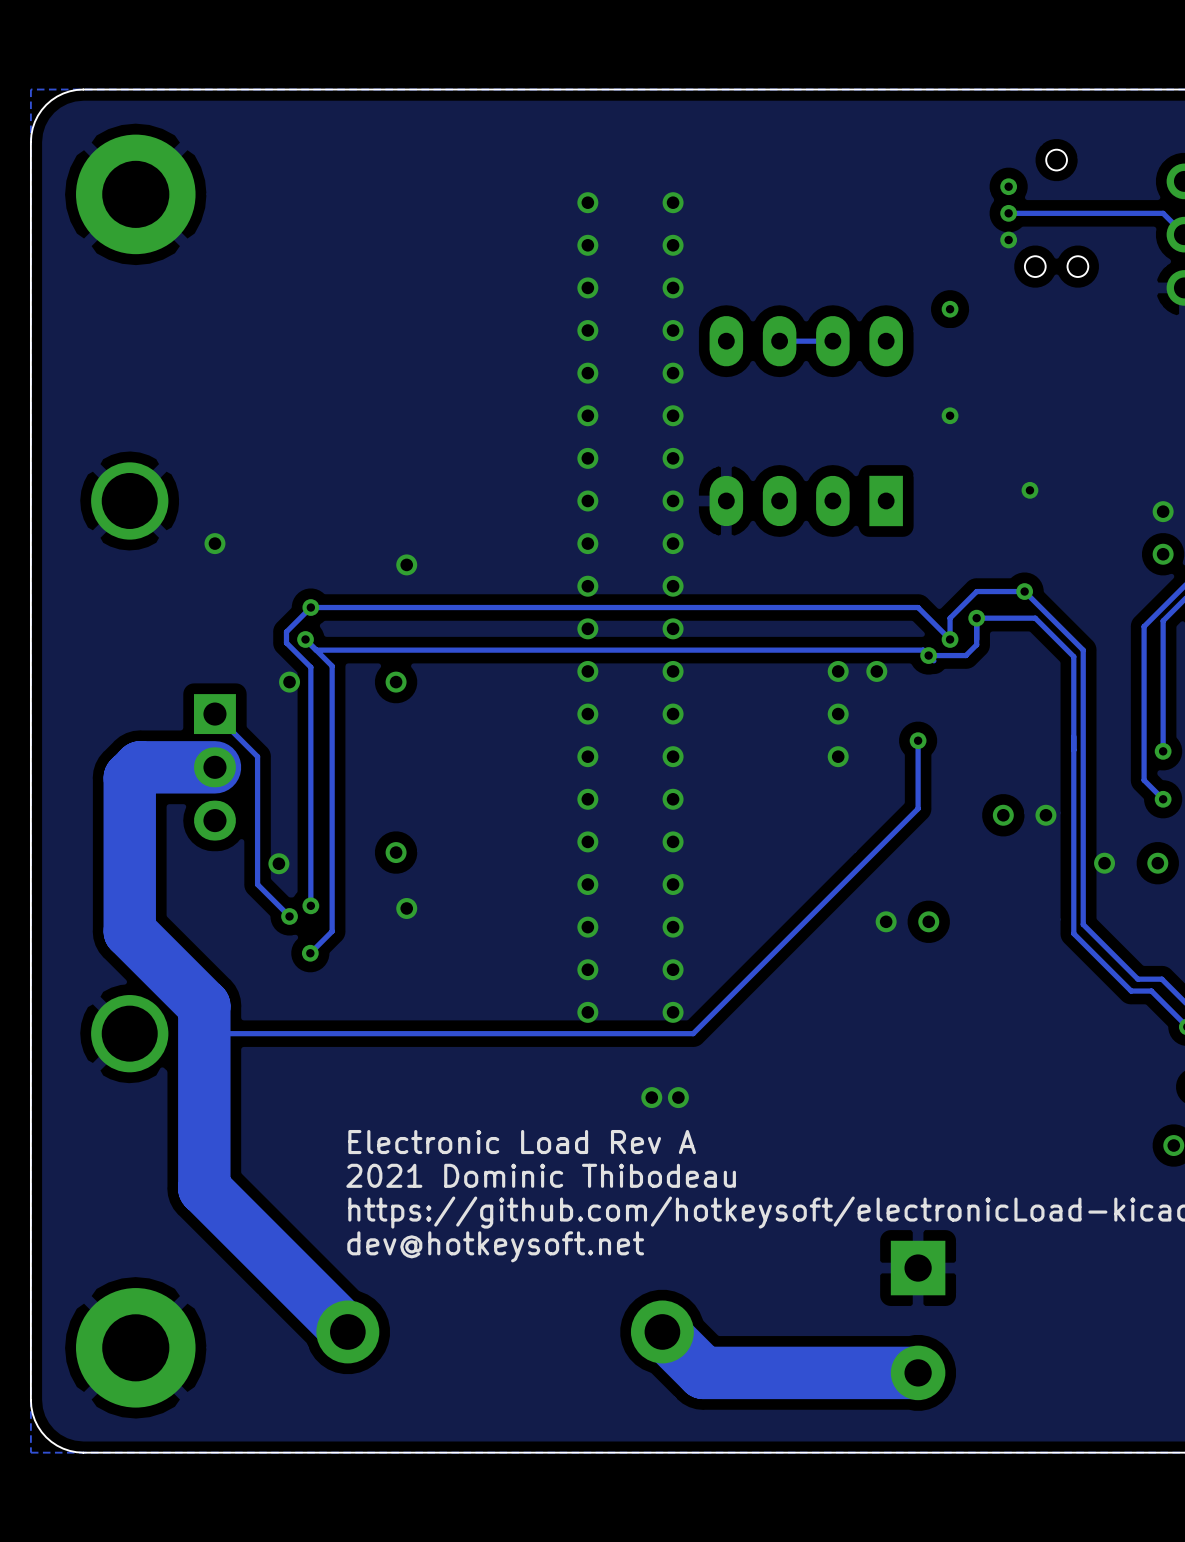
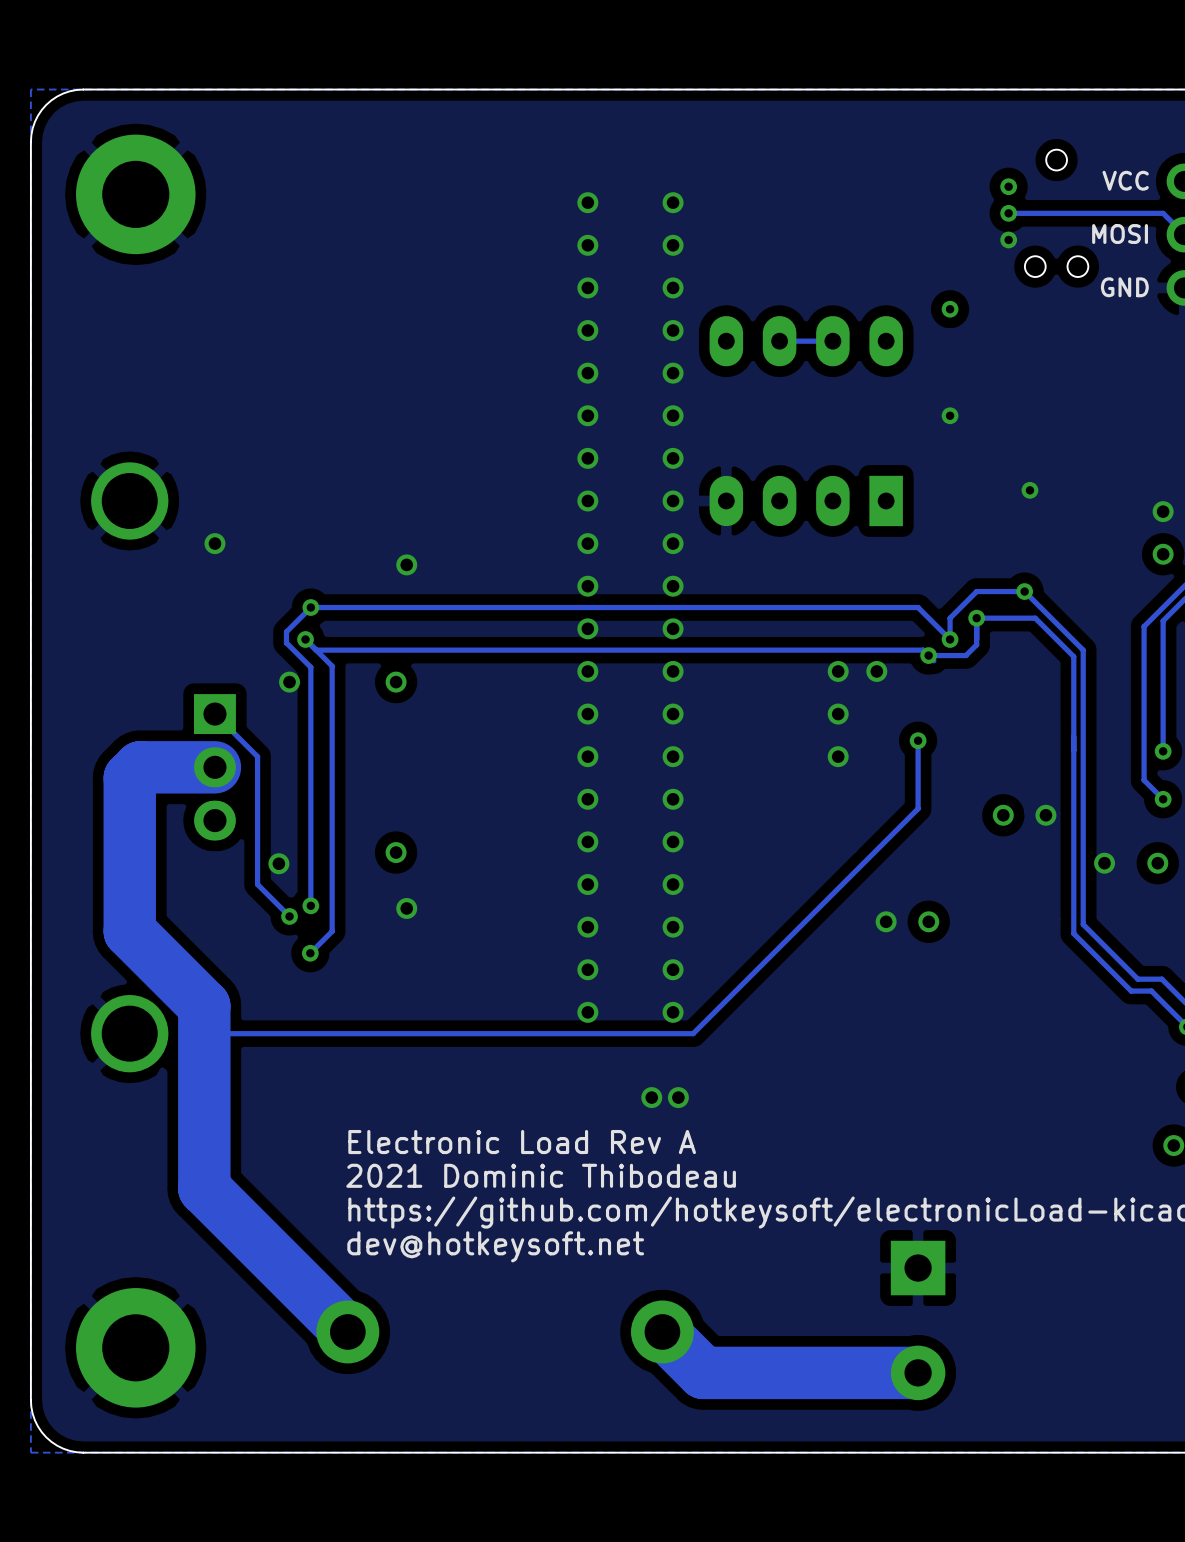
text: none -> VCC (1125, 180)
text: none -> MOSI (1120, 234)
text: none -> GND (1124, 287)

